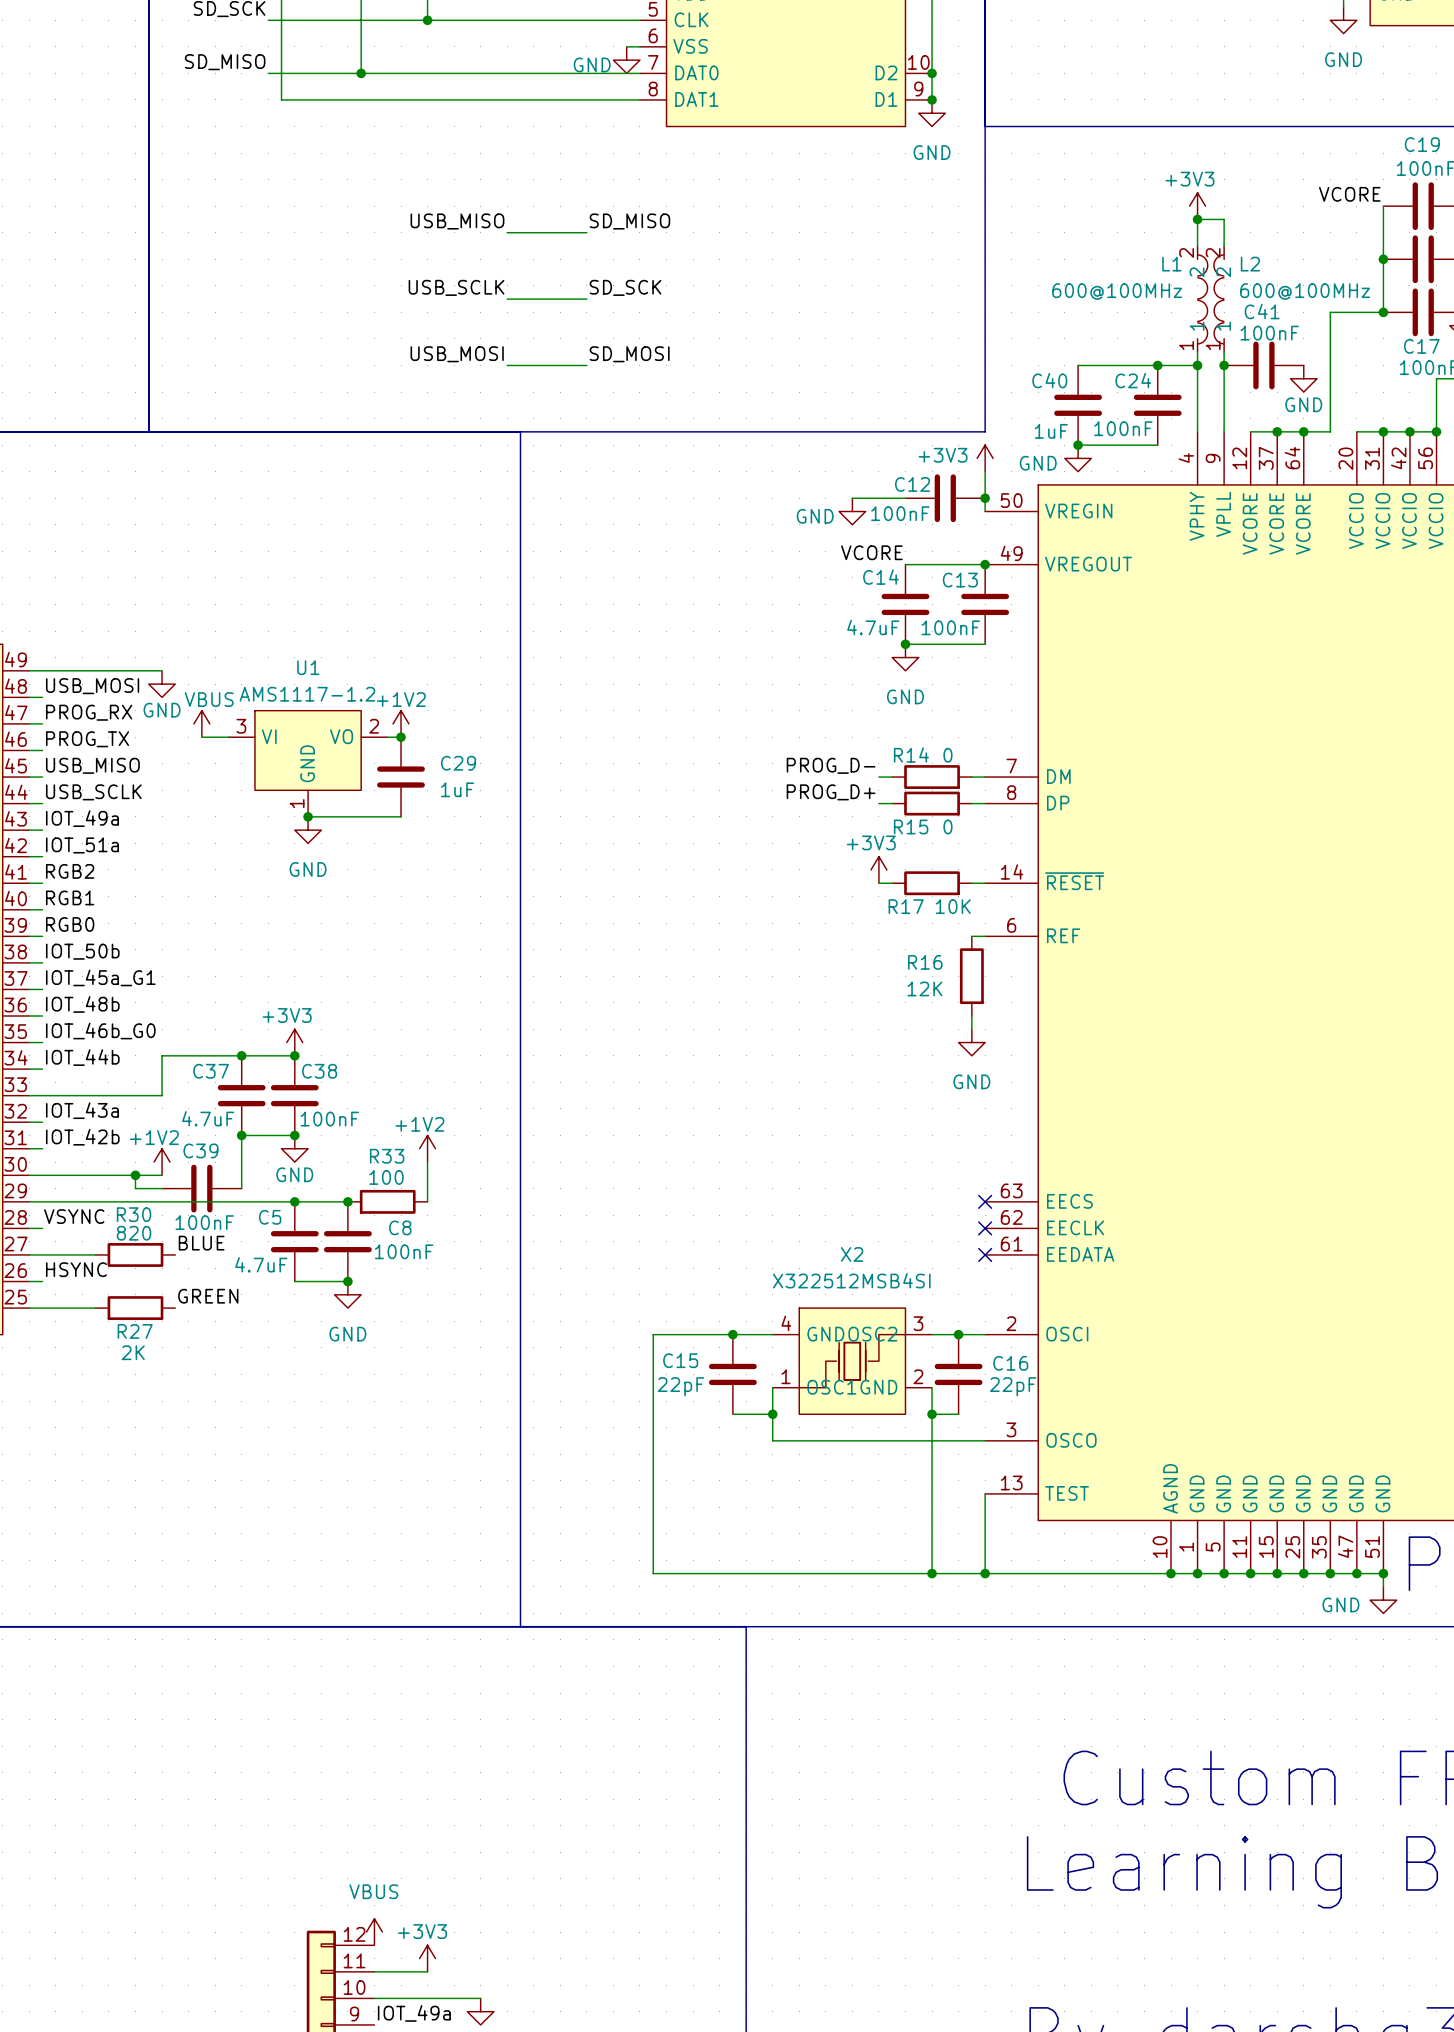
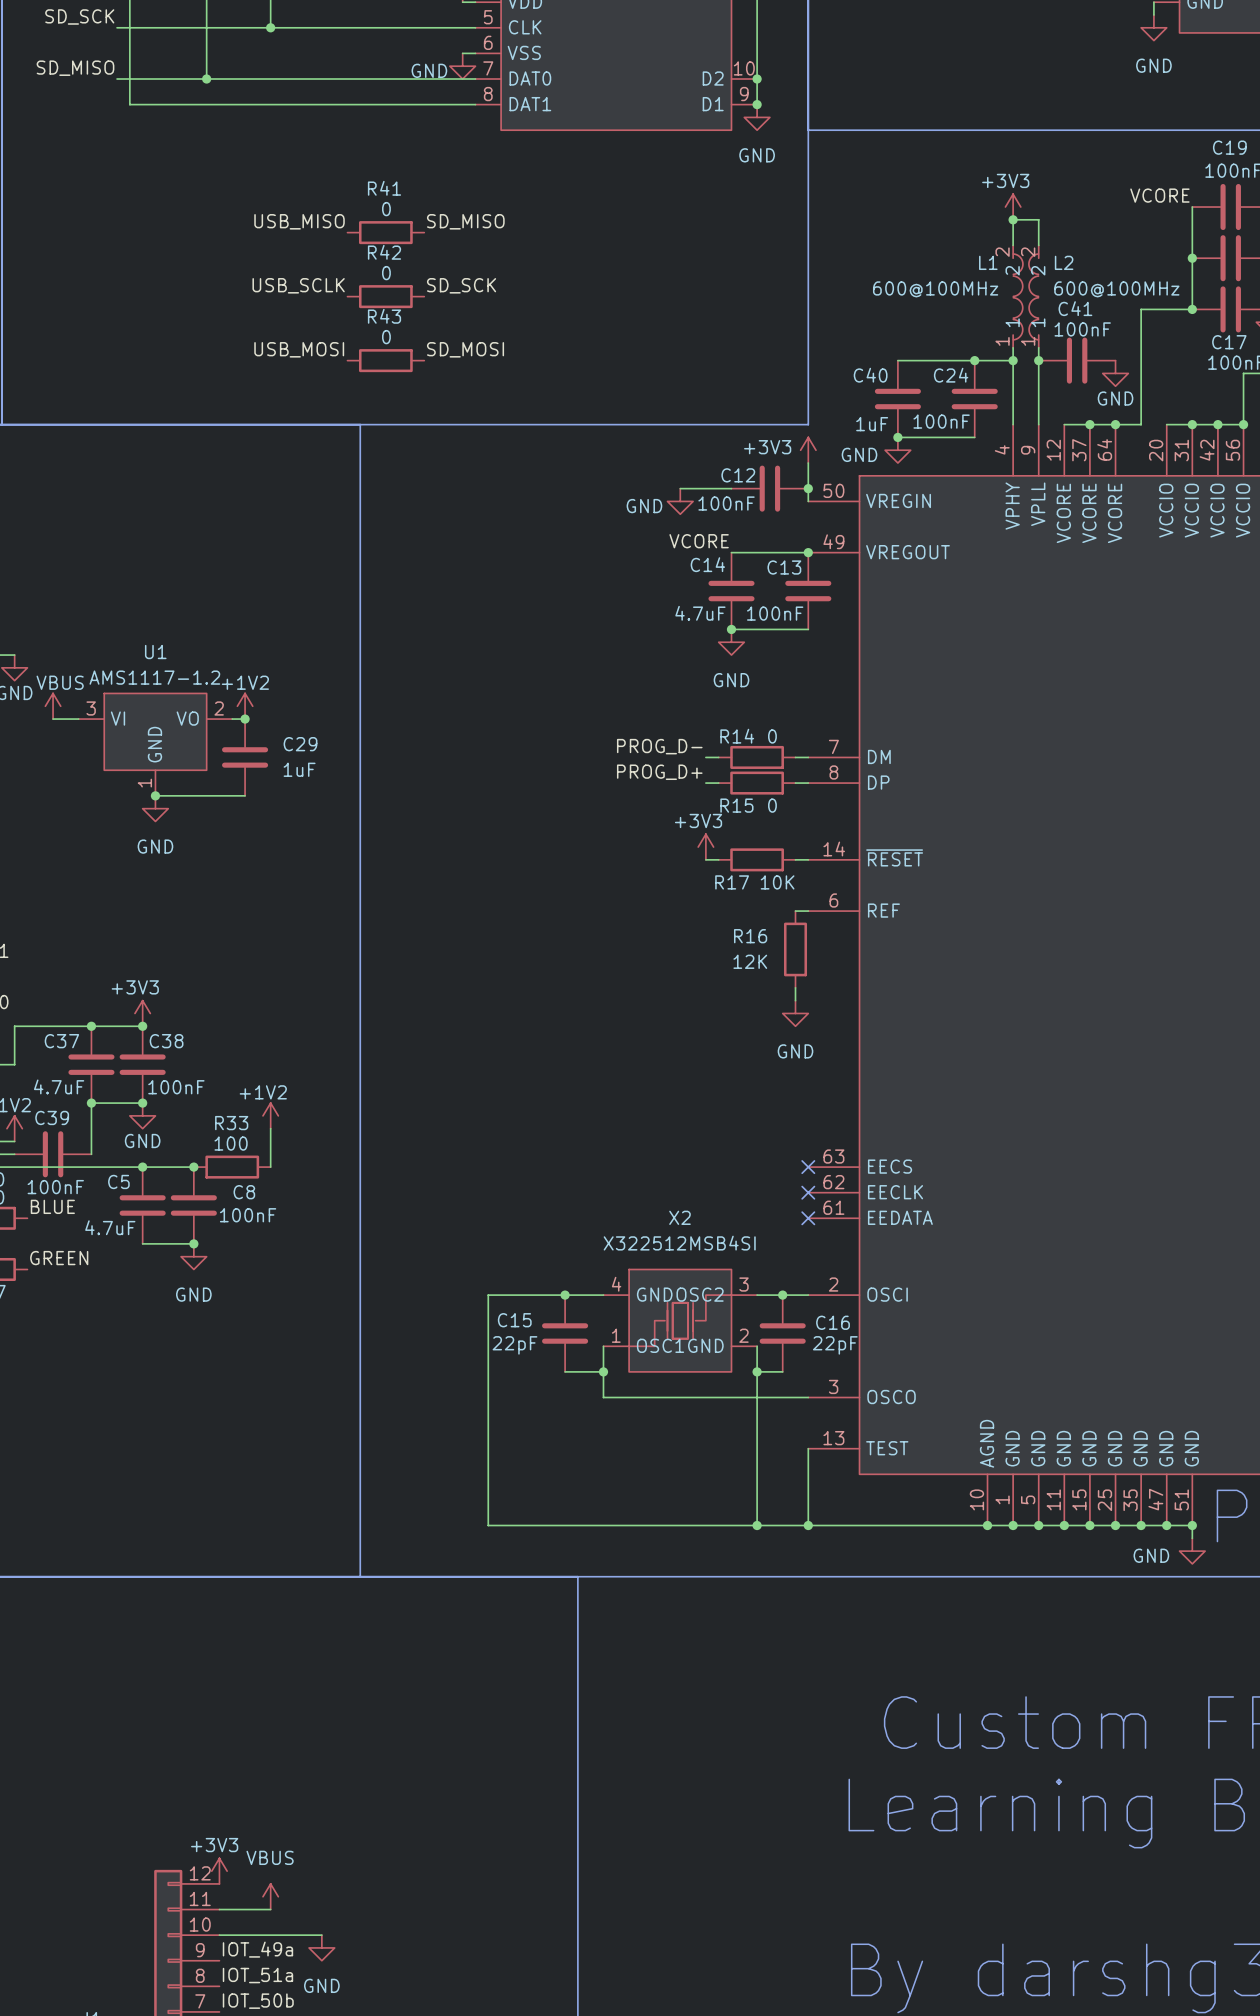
wire: (507, 232) (586, 232) -> none
R41: none -> 0 (385, 232)
wire: (507, 299) (586, 299) -> none
R42: none -> 0 (385, 296)
wire: (507, 365) (586, 365) -> none
R43: none -> 0 (385, 360)
power symbol: VBUS (374, 1932) -> +3V3 (219, 1871)
power symbol: +3V3 (427, 1958) -> VBUS (270, 1896)

